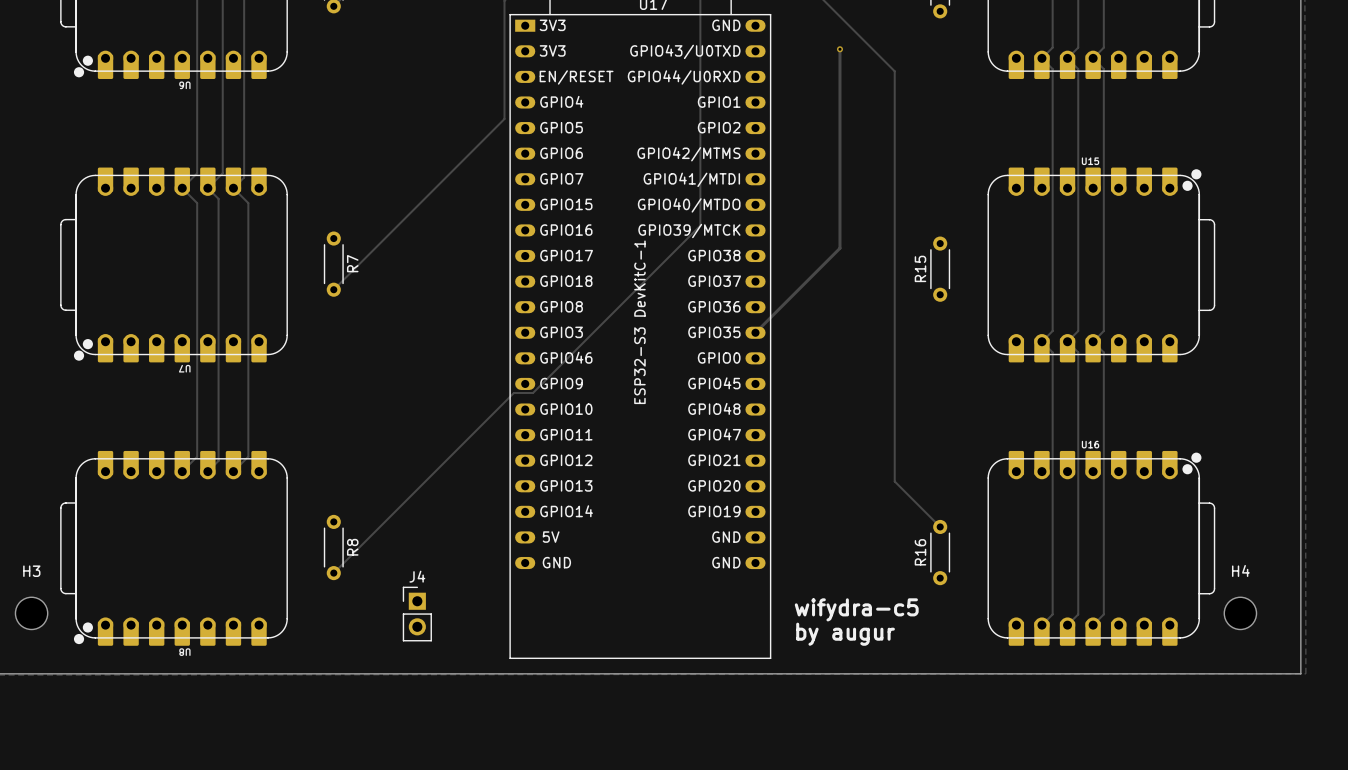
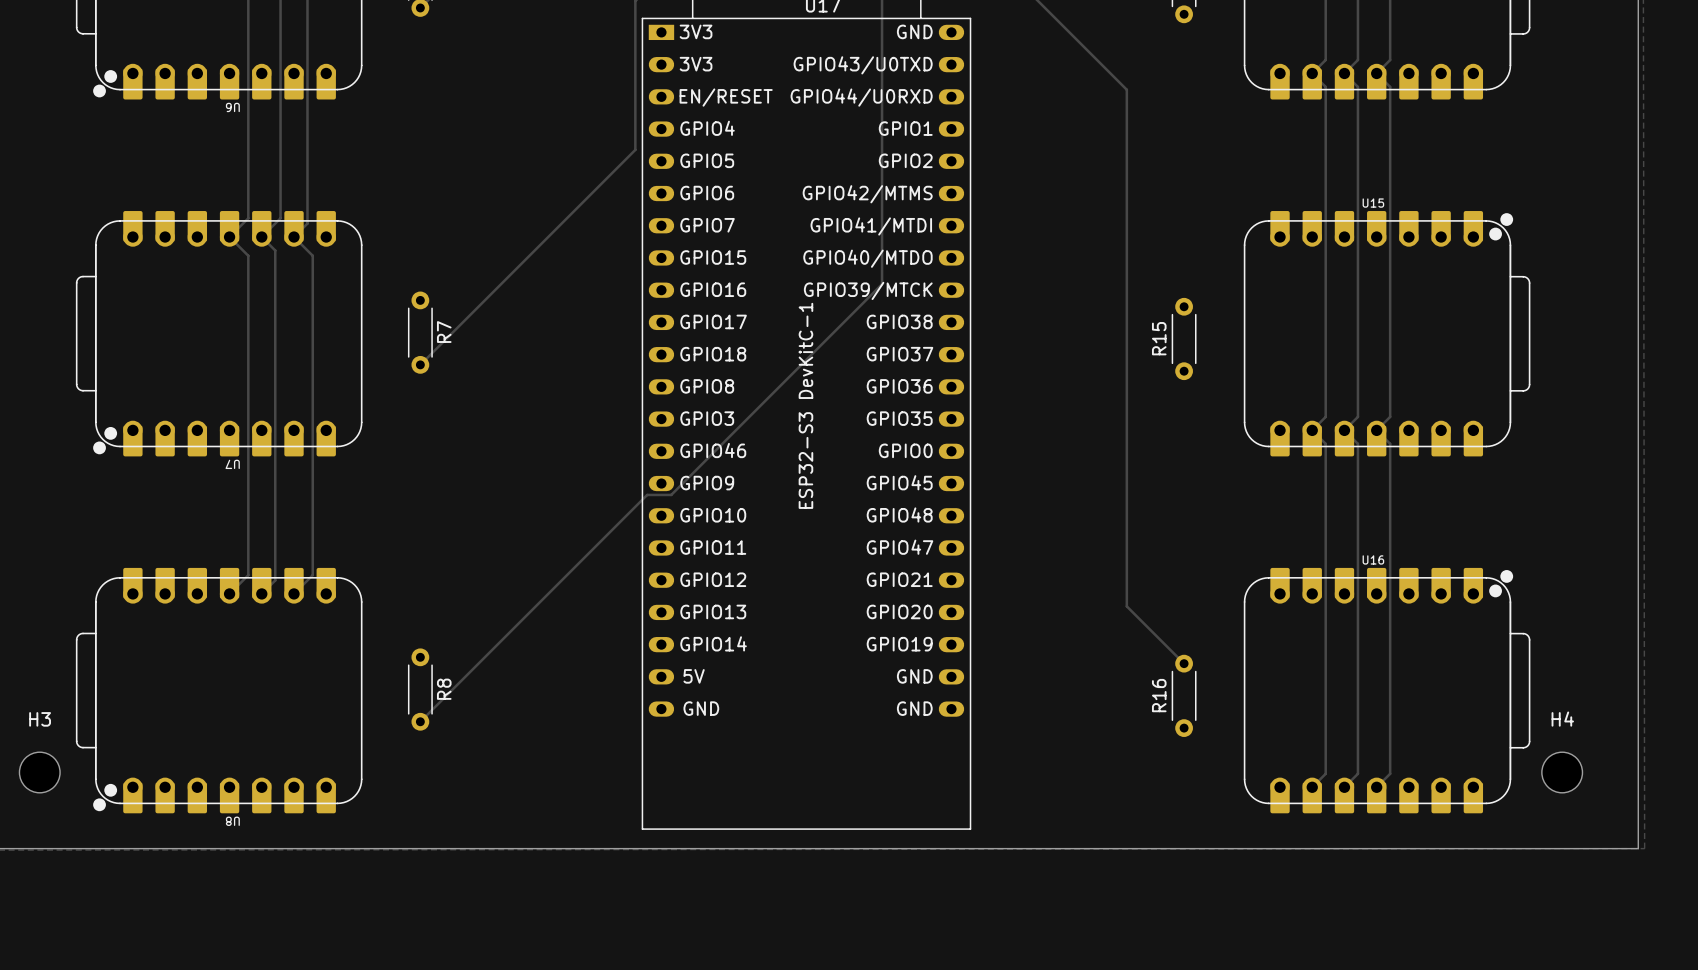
track: (839, 49) (839, 248) (755, 332) -> none
via: (839, 49) -> none
text: wifydra-c5 (856, 609) -> none
J4: (417, 614) -> none
text: by augur (845, 634) -> none

